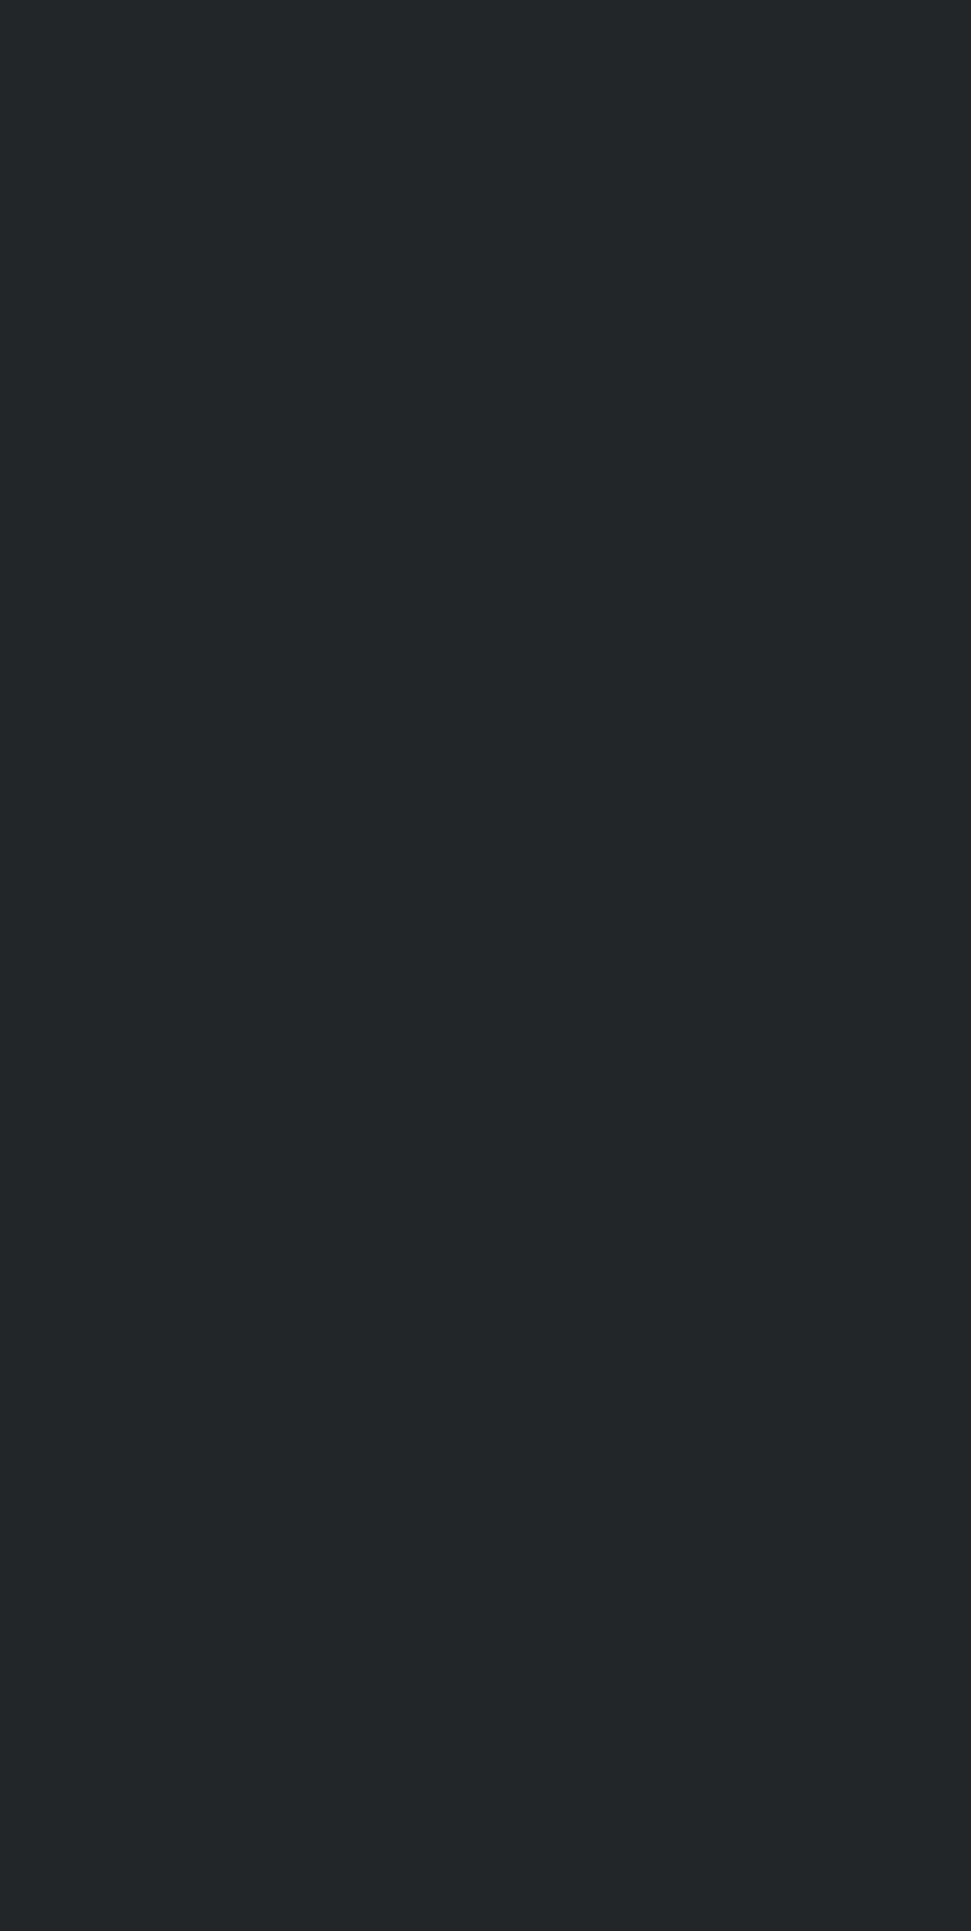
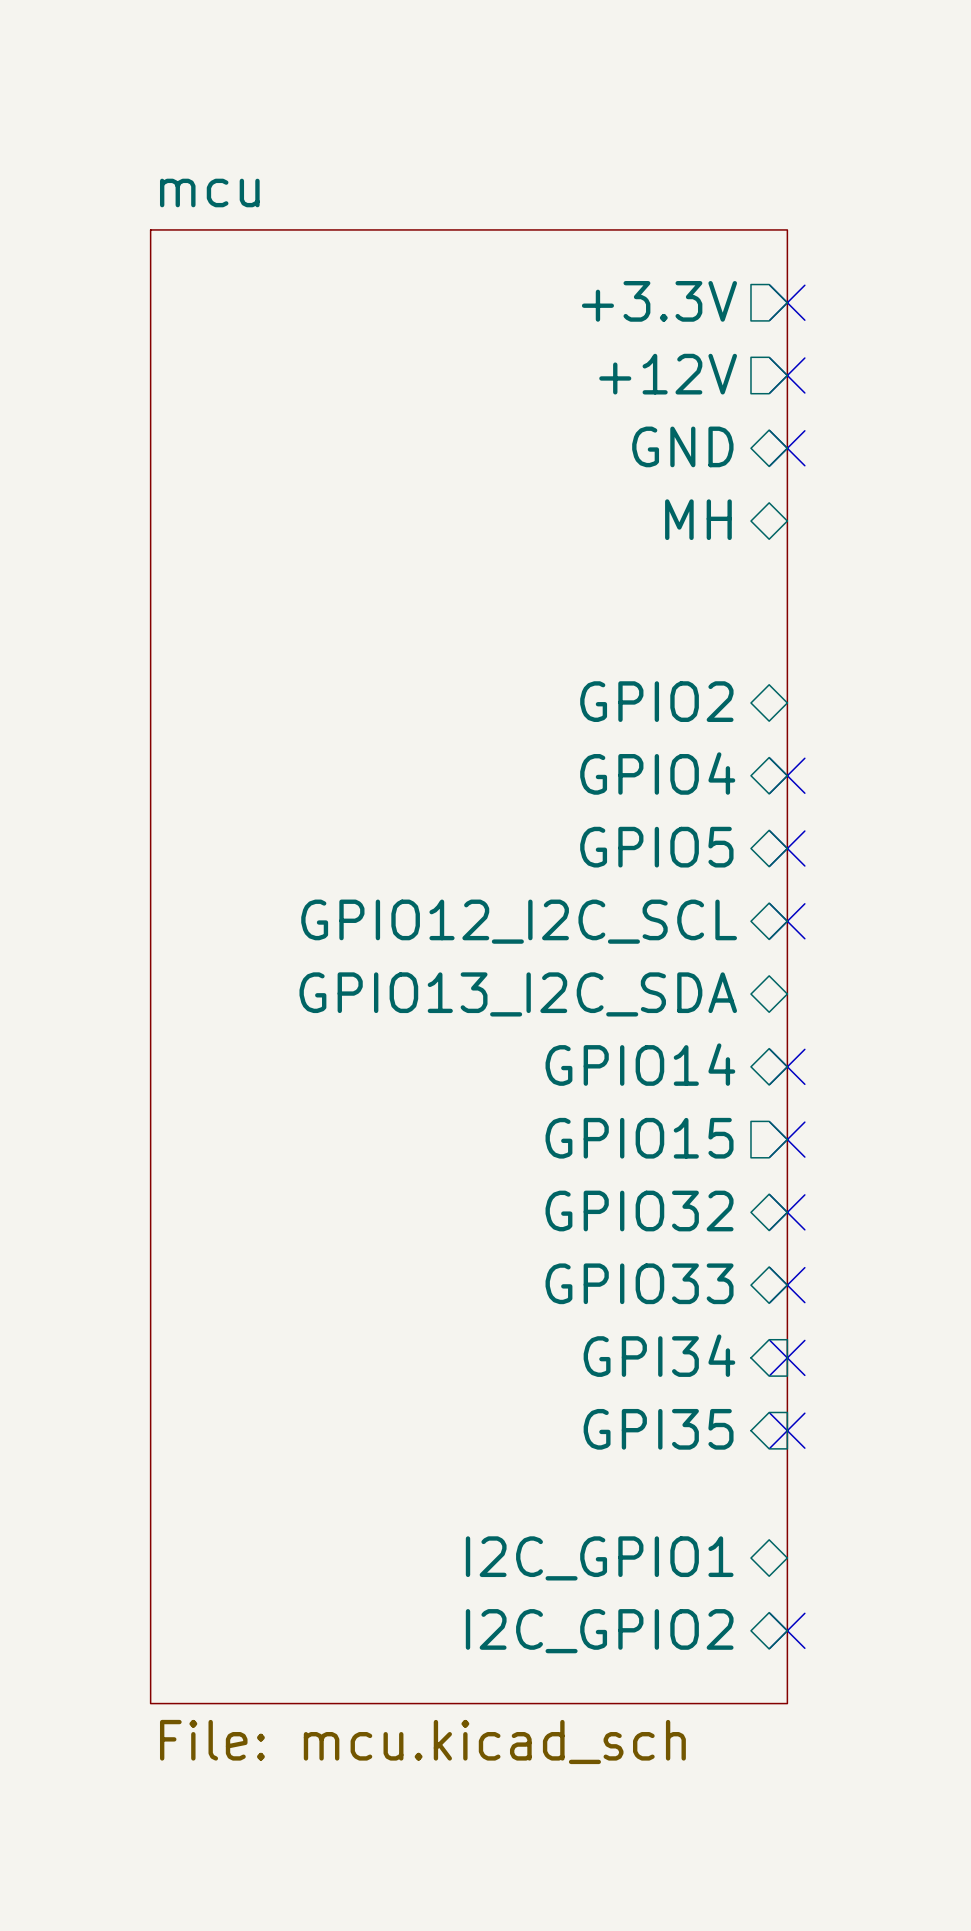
sheet pin: none -> +3.3V (659, 301)
no-connect mark: none -> (787, 302)
sheet pin: none -> +12V (668, 374)
no-connect mark: none -> (787, 375)
sheet pin: none -> GND (682, 446)
no-connect mark: none -> (787, 448)
sheet pin: none -> MH (698, 519)
sheet pin: none -> GPIO2 (656, 701)
sheet pin: none -> GPIO4 (657, 773)
no-connect mark: none -> (787, 775)
sheet pin: none -> GPIO5 (656, 847)
no-connect mark: none -> (787, 848)
sheet pin: none -> GPIO12_I2C_SCL (519, 921)
no-connect mark: none -> (787, 921)
sheet mcu: none -> File: mcu.kicad_sch (469, 966)
sheet pin: none -> GPIO13_I2C_SDA (518, 994)
sheet pin: none -> GPIO14 (640, 1064)
no-connect mark: none -> (787, 1066)
sheet pin: none -> GPIO15 (639, 1138)
no-connect mark: none -> (787, 1139)
sheet pin: none -> GPIO32 (639, 1211)
no-connect mark: none -> (787, 1212)
sheet pin: none -> GPIO33 (639, 1283)
no-connect mark: none -> (787, 1285)
sheet pin: none -> GPI34 (659, 1355)
no-connect mark: none -> (787, 1357)
sheet pin: none -> GPI35 (658, 1429)
no-connect mark: none -> (787, 1430)
sheet pin: none -> I2C_GPIO1 (599, 1558)
no-connect mark: none -> (787, 1630)
sheet pin: none -> I2C_GPIO2 (599, 1631)

